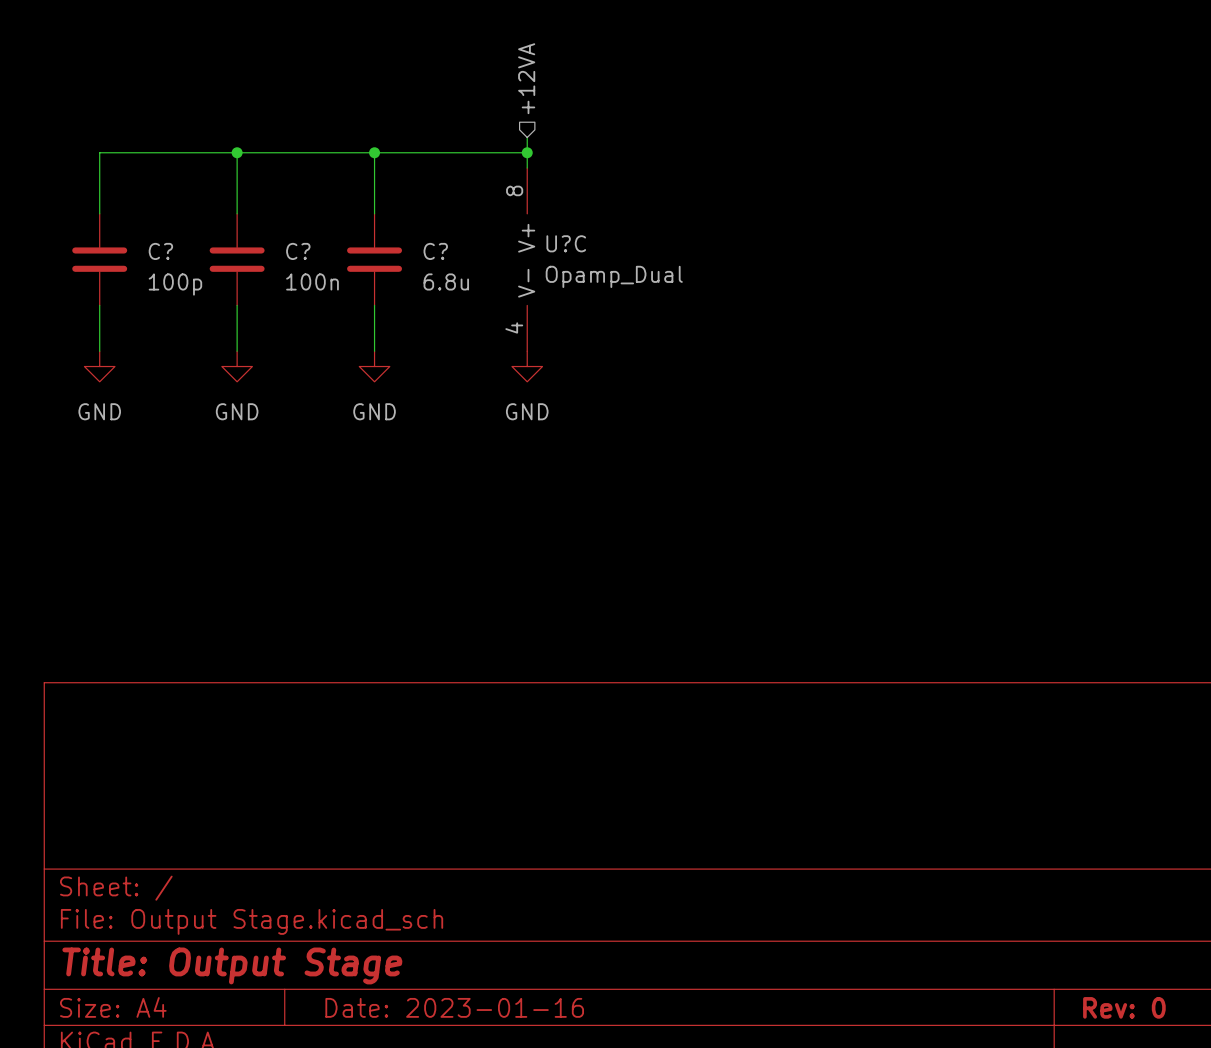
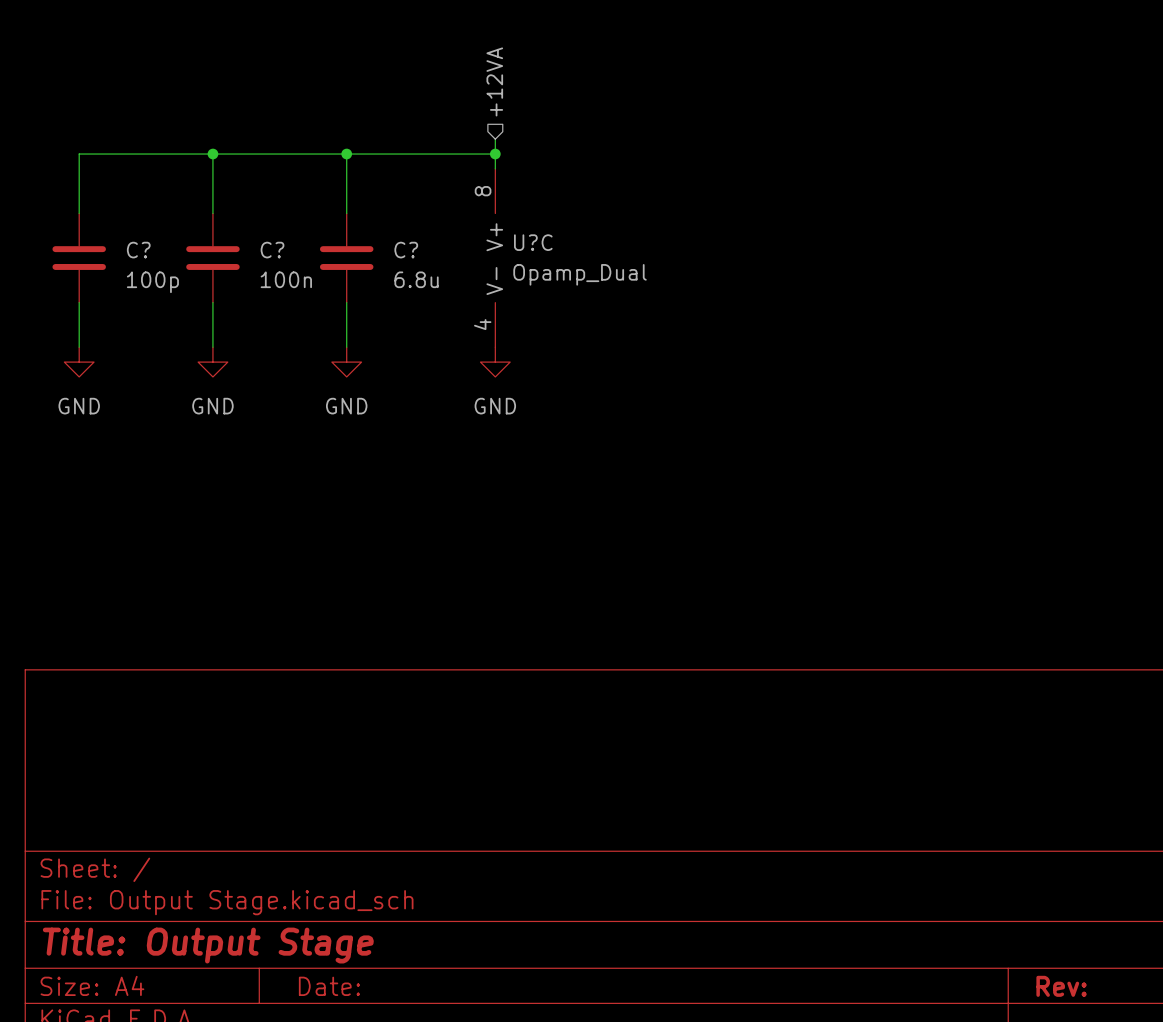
title block: Date: 2023-01-16 (454, 1007) -> Date: (329, 986)
title block: Rev: 0 (1124, 1007) -> Rev: (1061, 986)

